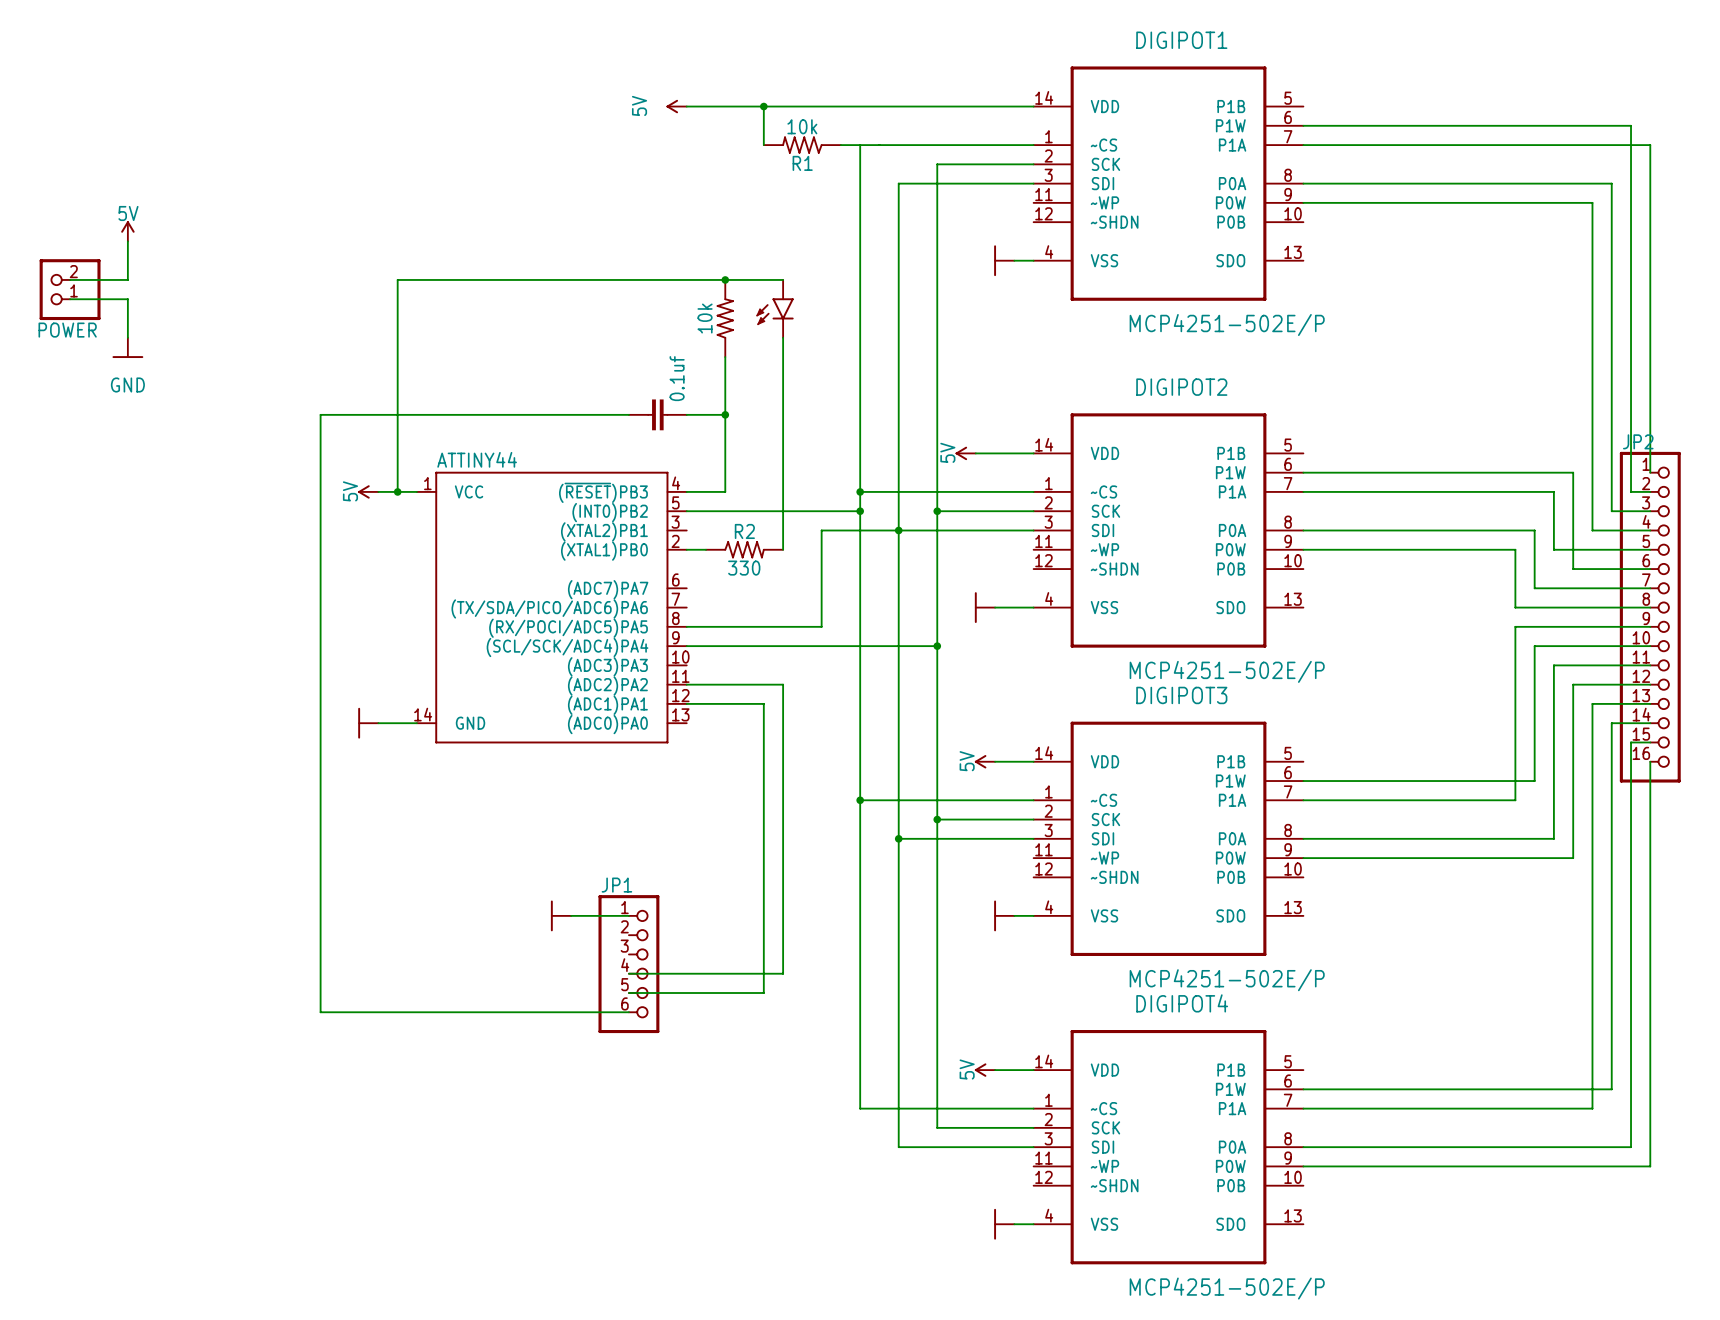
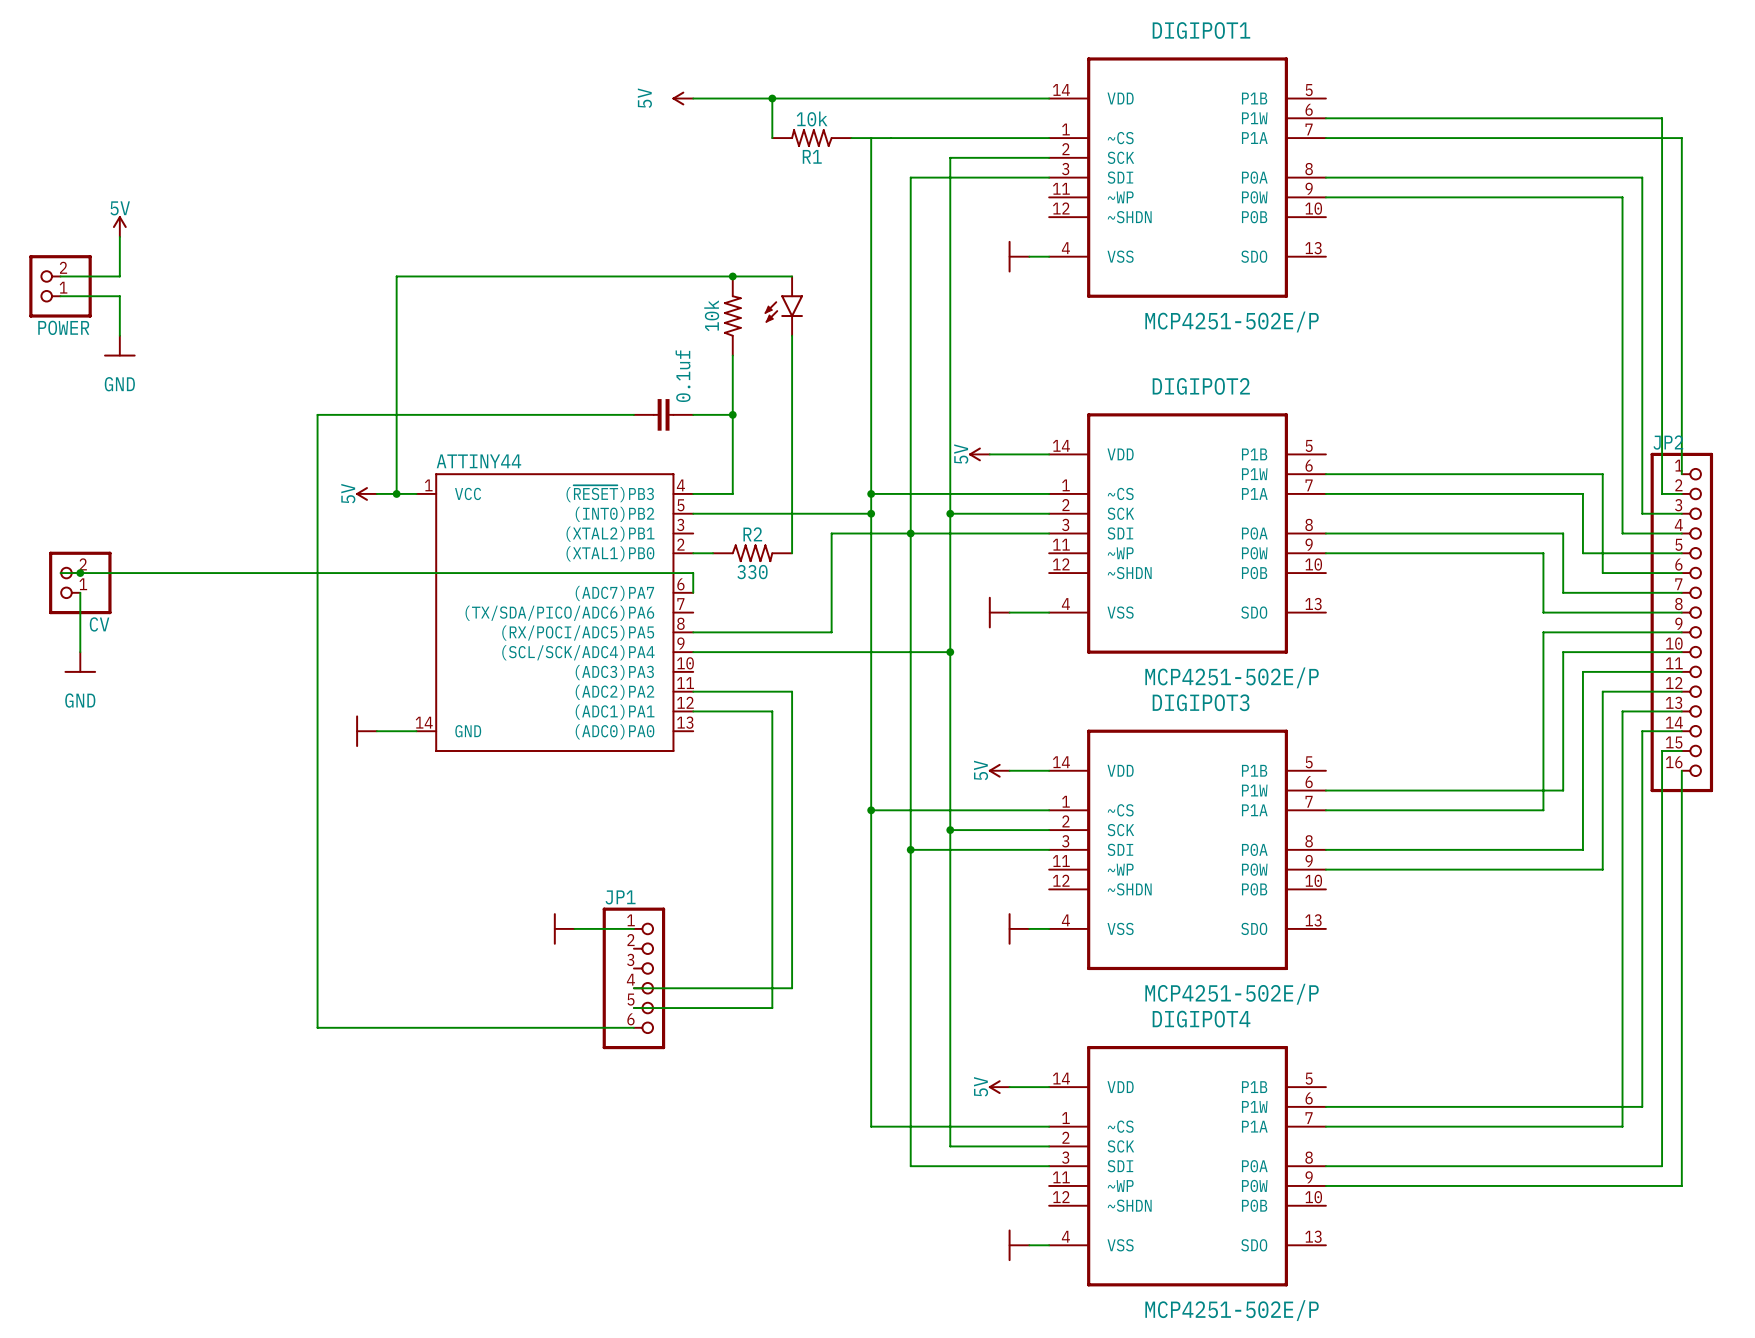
wire: none -> (60, 573) (693, 573) (693, 592)
junction: none -> (80, 573)
CV: none -> (80, 582)
wire: none -> (80, 592) (80, 652)
power symbol: none -> GND (80, 662)

